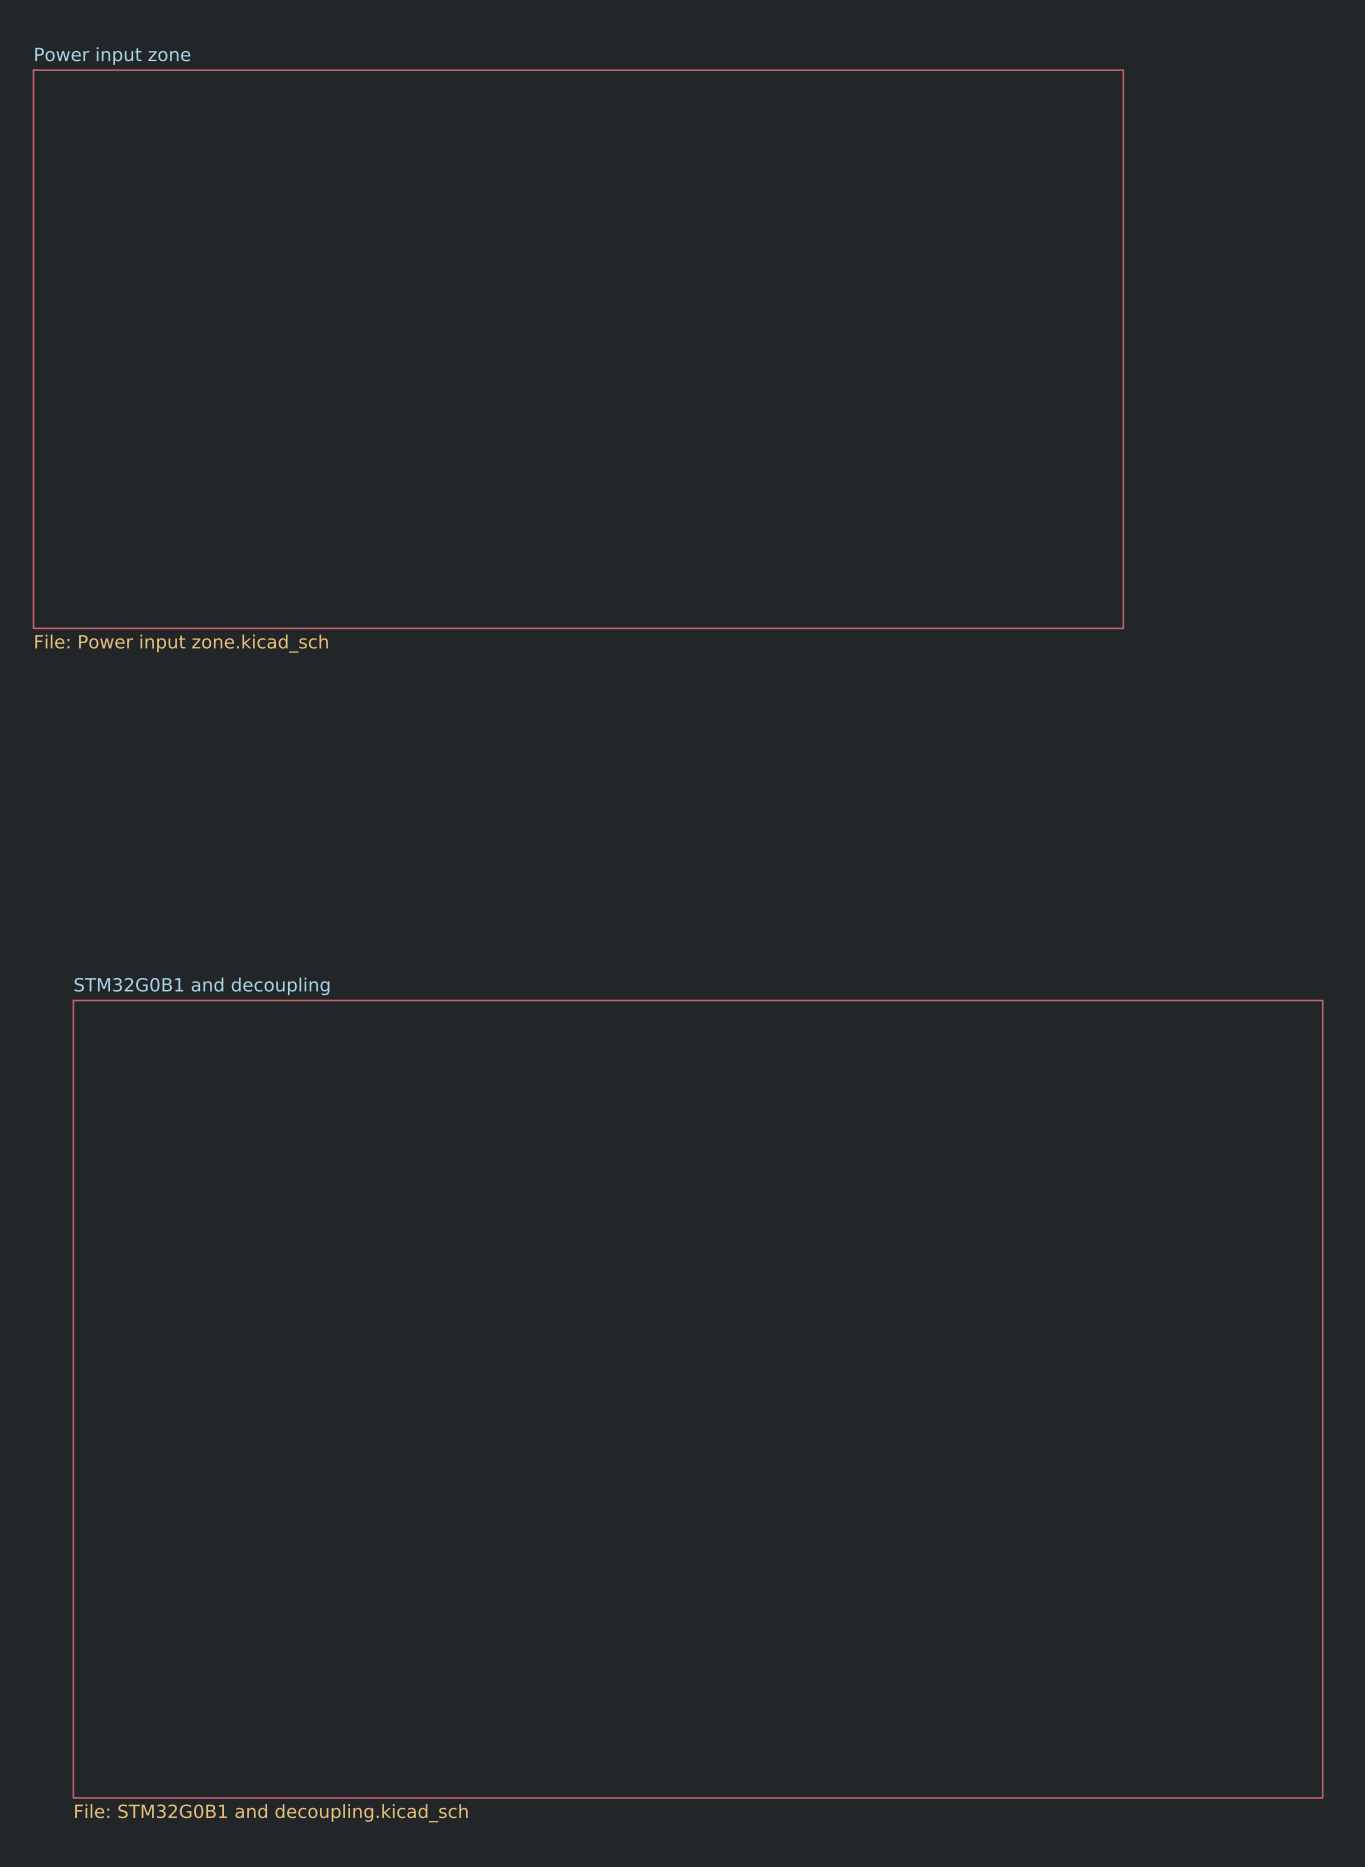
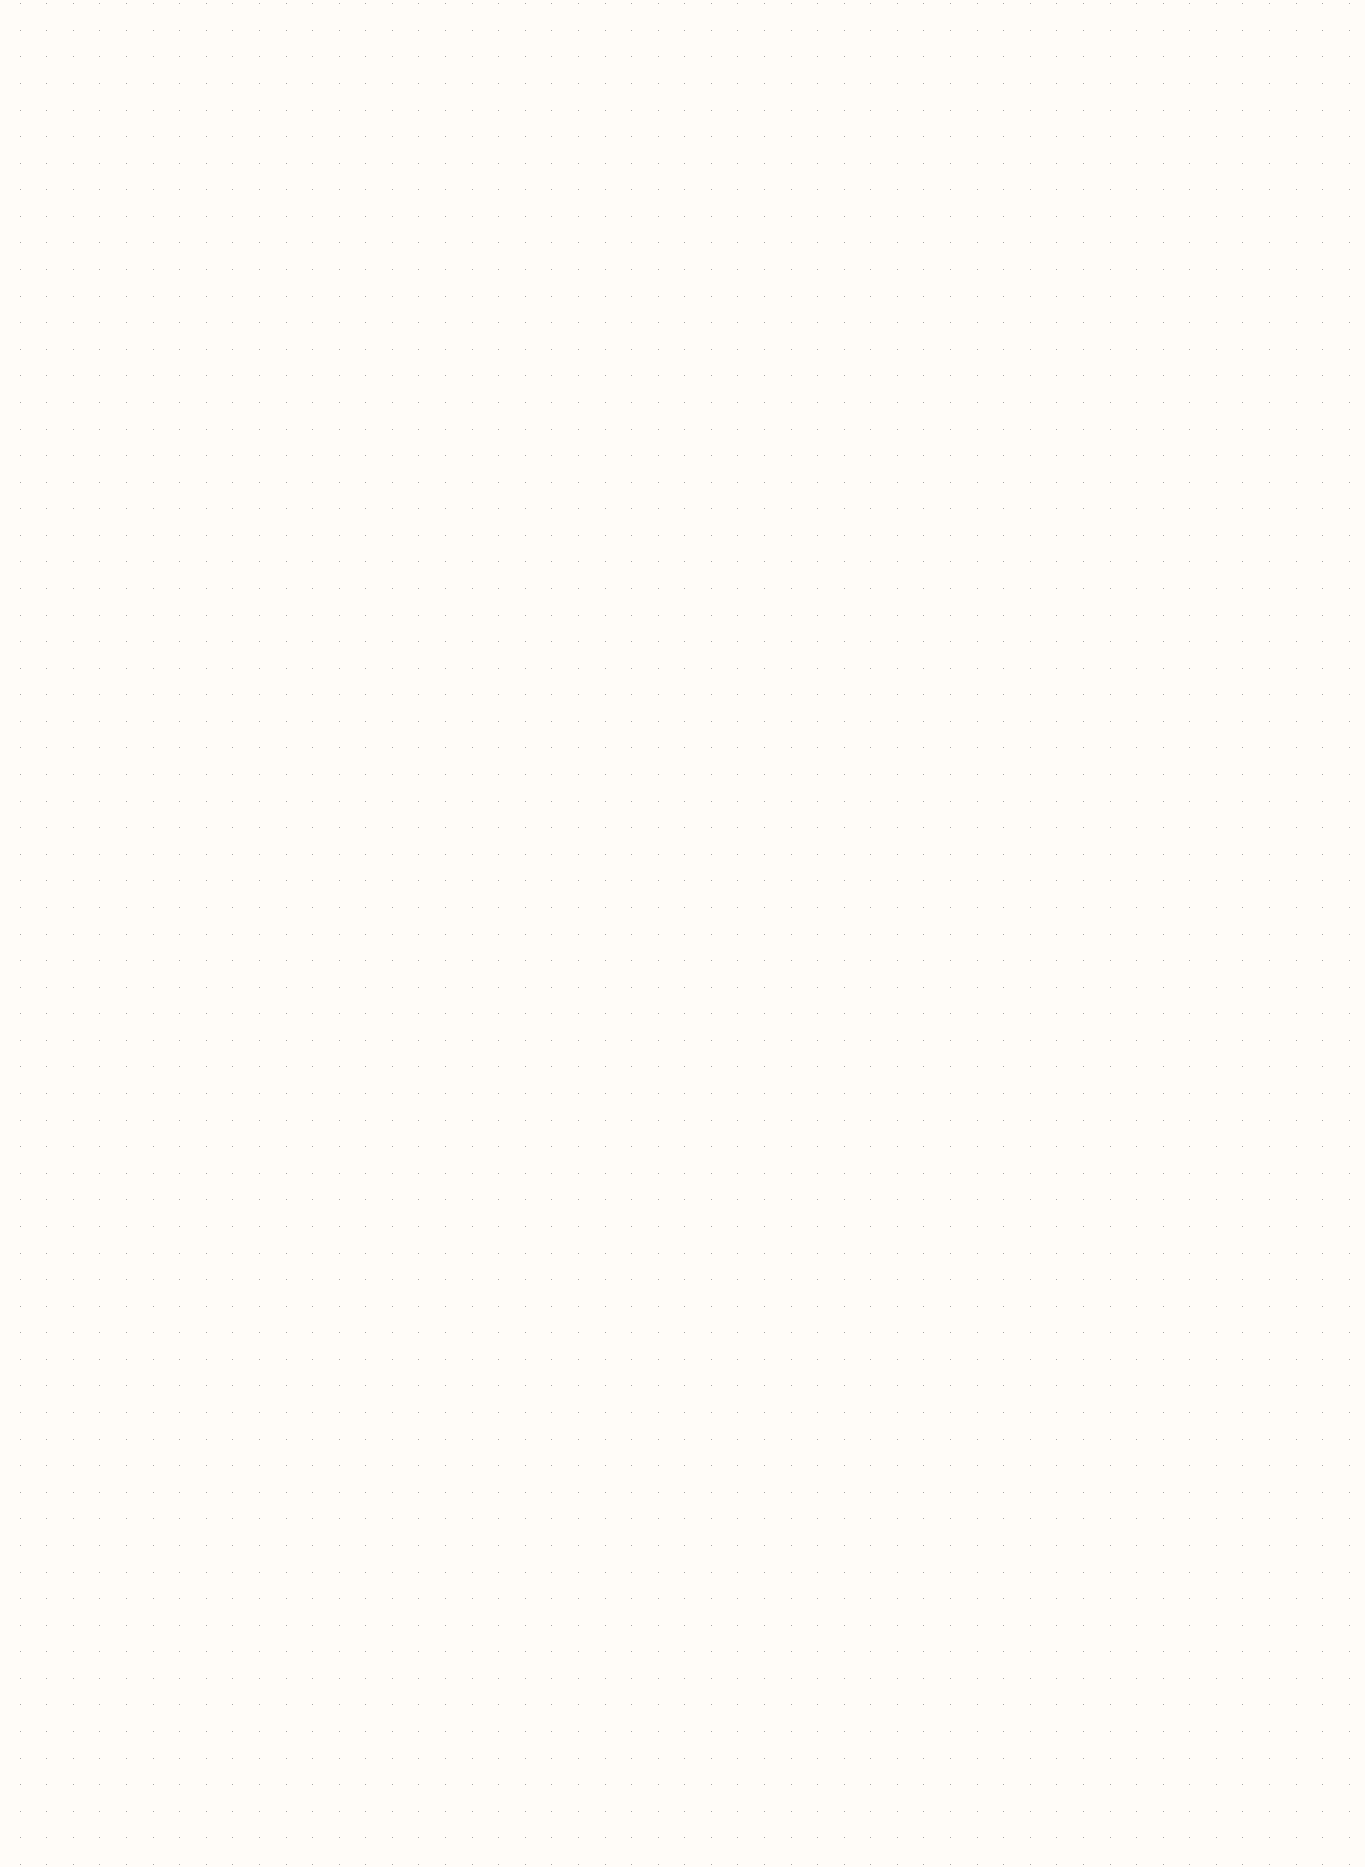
sheet Power input zone: File: Power input zone.kicad_sch (578, 349) -> none
sheet STM32G0B1 and decoupling: File: STM32G0B1 and decoupling.kicad_sch (698, 1399) -> none

